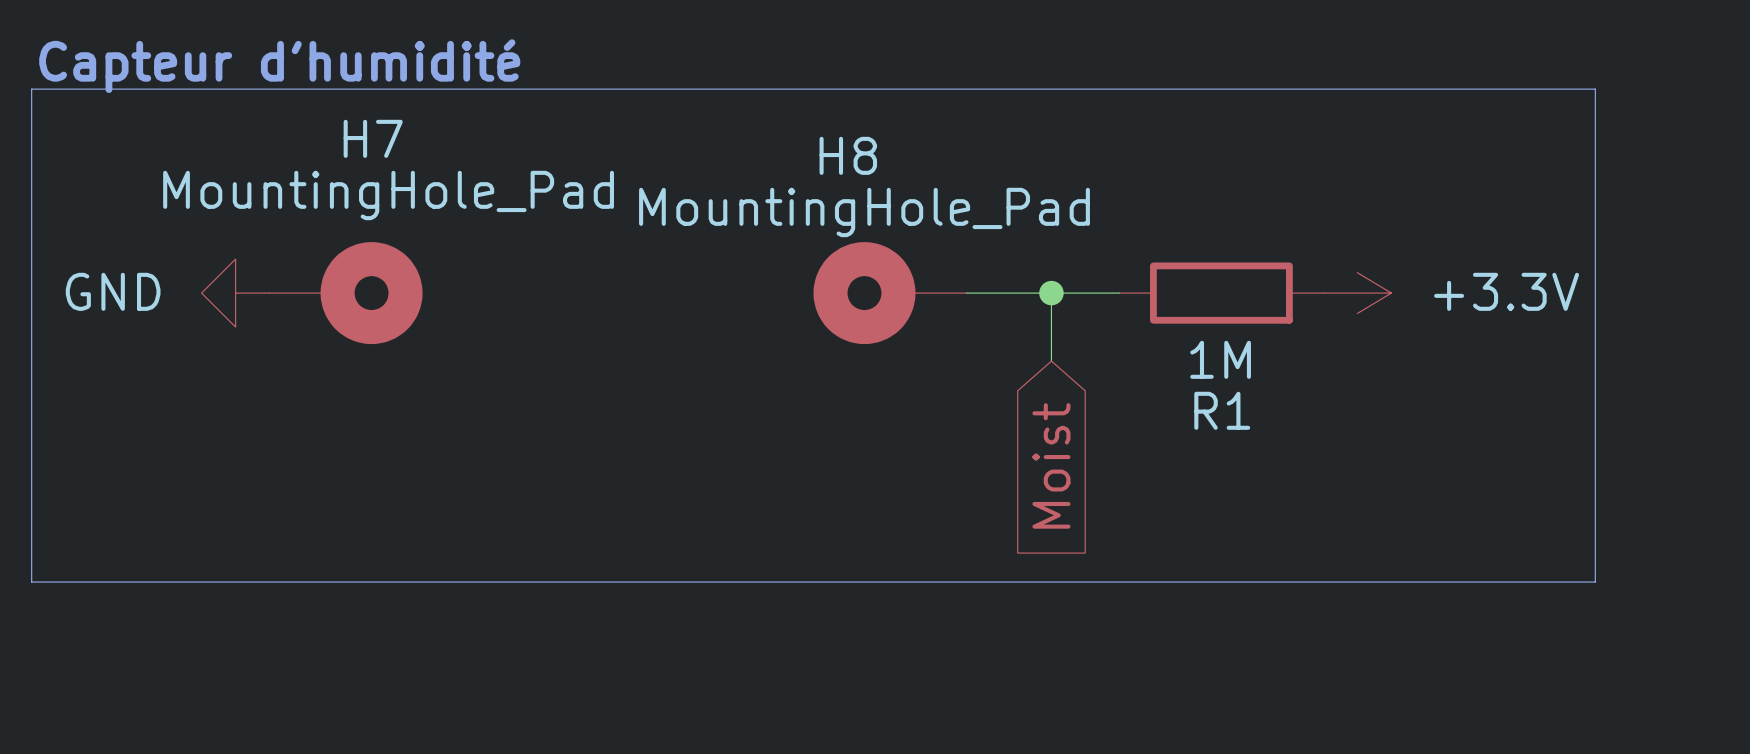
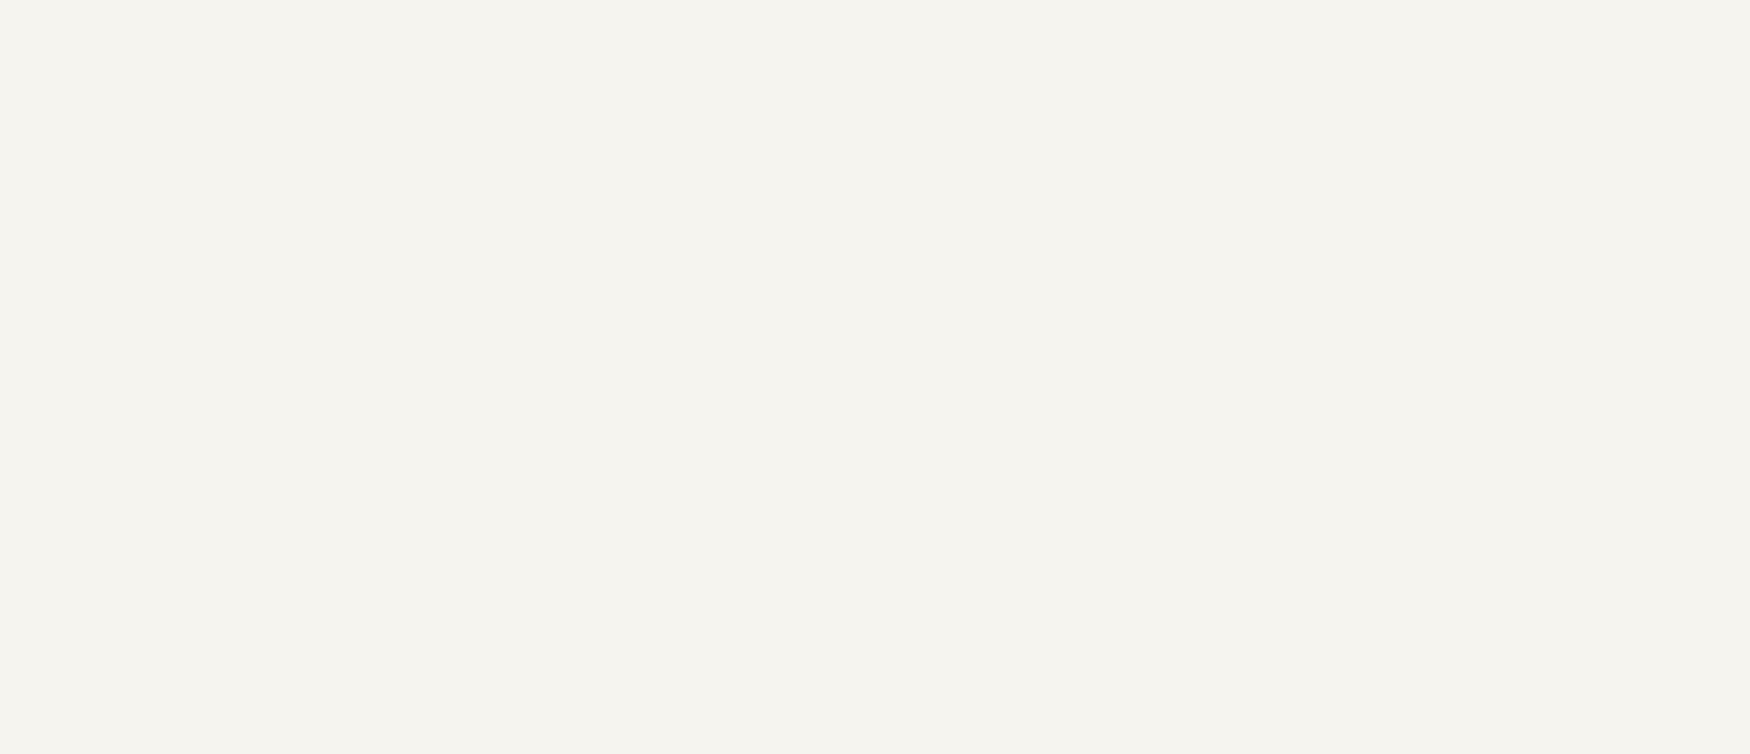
text: Capteur d'humidité (279, 66) -> none
line: (31, 89) (1595, 89) (1595, 582) (31, 582) (31, 89) -> none
power symbol: GND (235, 293) -> none
H7: MountingHole_Pad (346, 293) -> none
H8: MountingHole_Pad (889, 293) -> none
wire: (966, 293) (1119, 293) -> none
wire: (1051, 293) (1051, 361) -> none
junction: (1051, 293) -> none
R1: 1M (1221, 293) -> none
power symbol: +3.3V (1357, 293) -> none
global label: Moist (1051, 465) -> none

